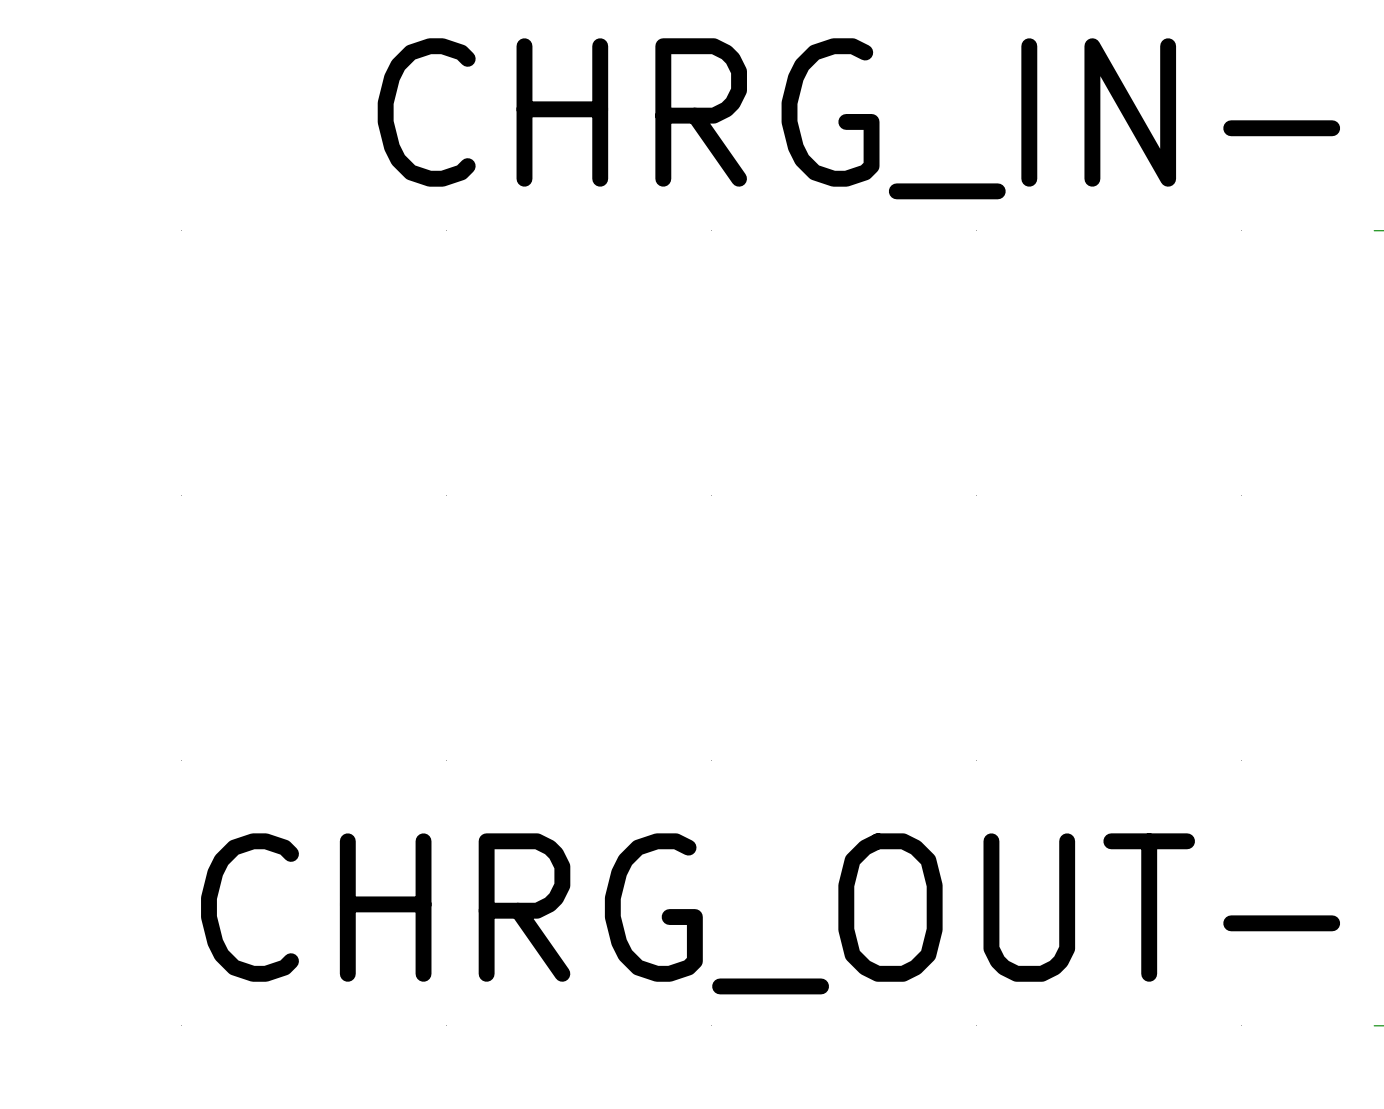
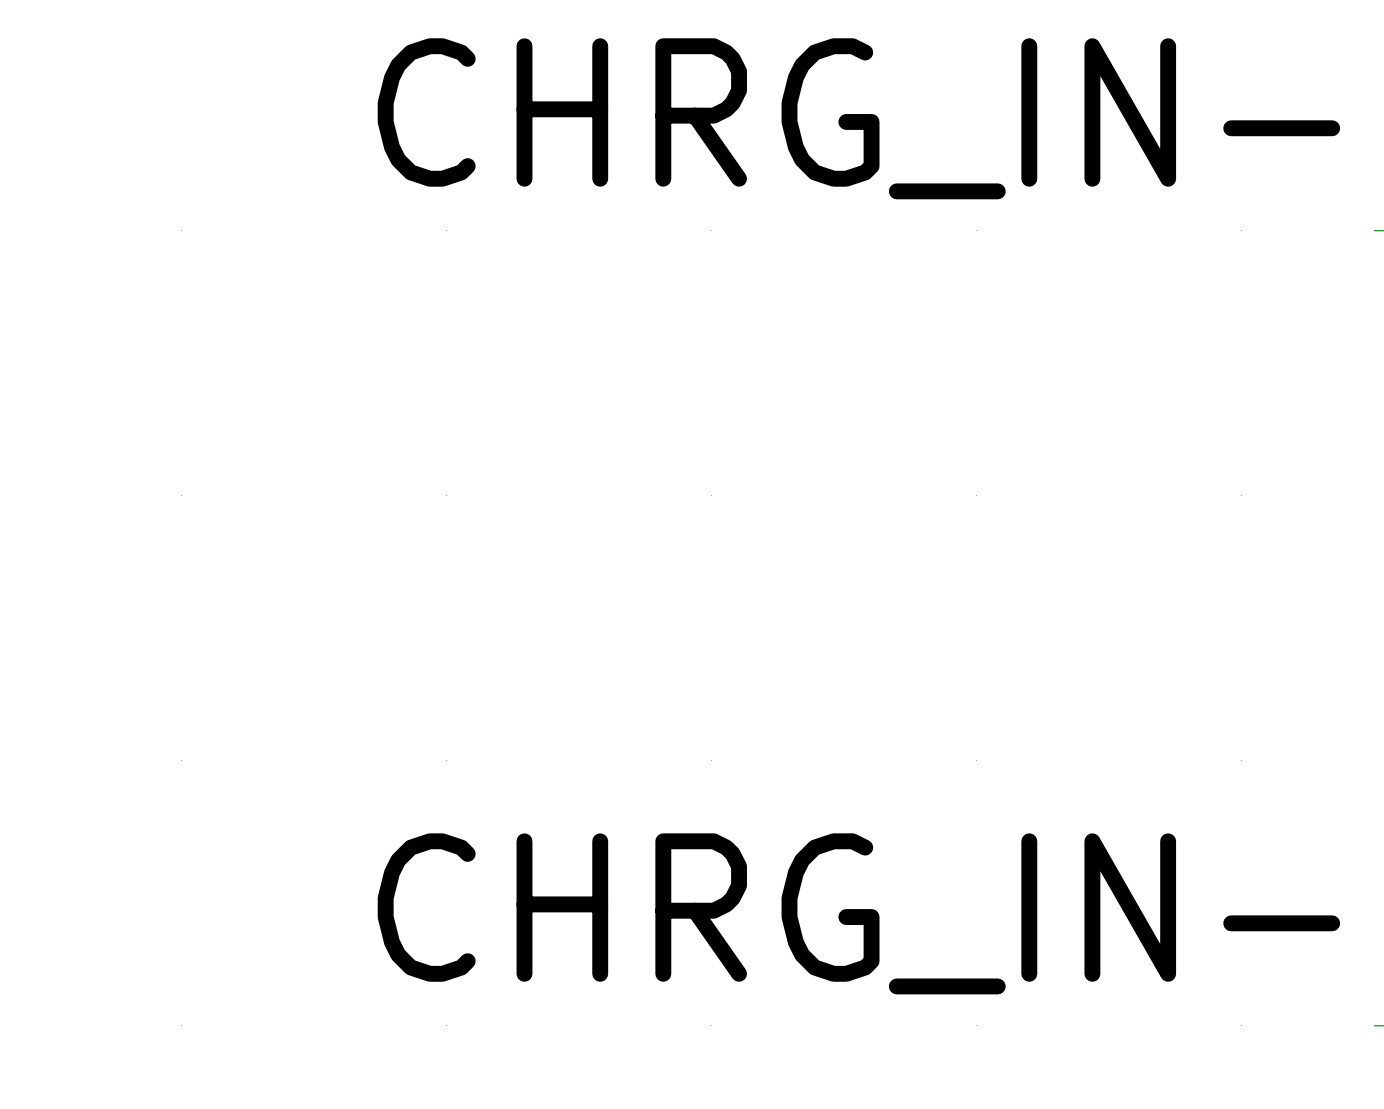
label: CHRG_OUT- (770, 913) -> CHRG_IN- (858, 913)

